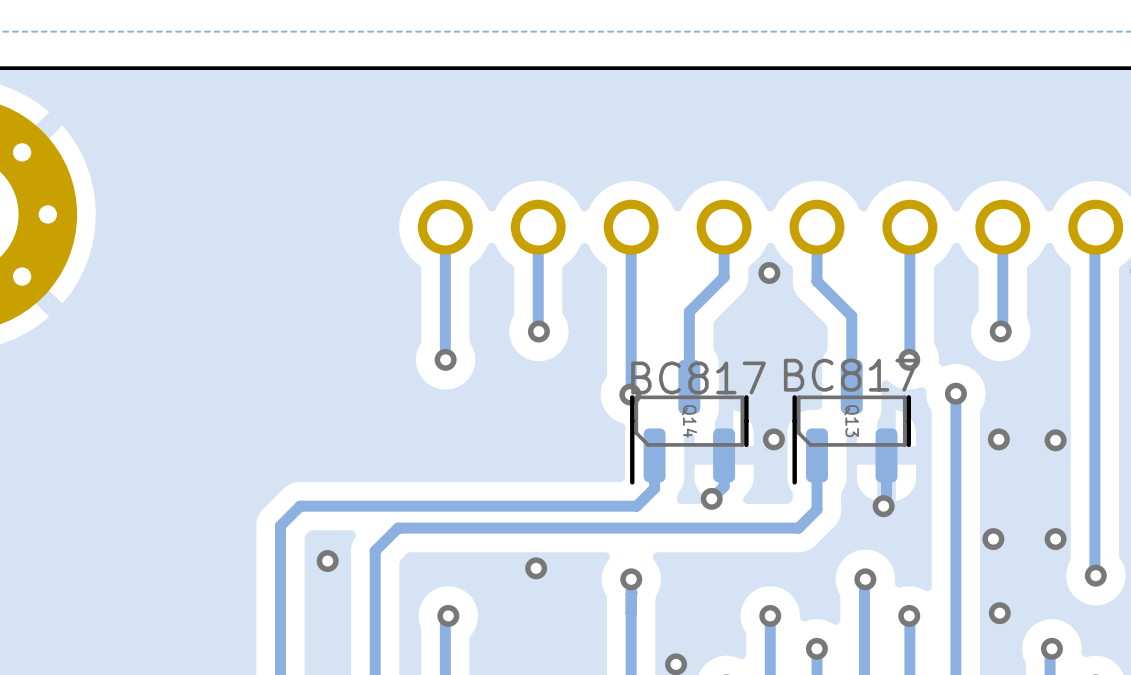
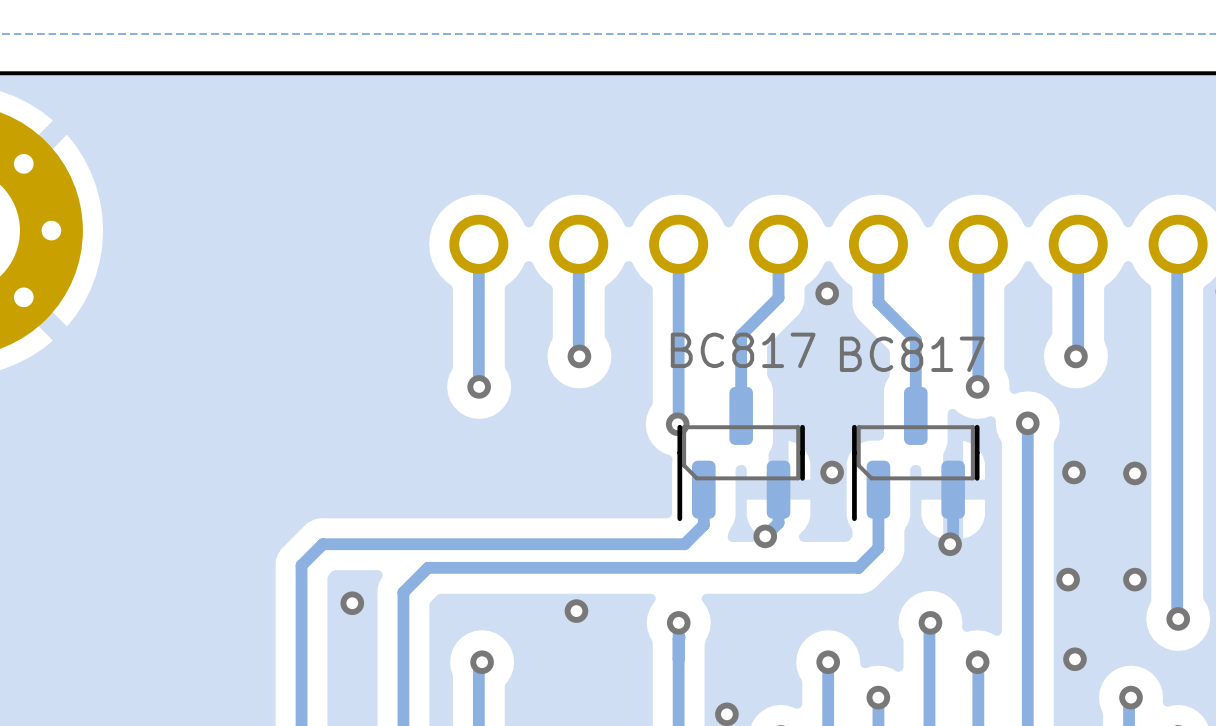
Q13 value position: BC817 (851, 375) -> BC817 (912, 354)
Q14 value position: BC817 (698, 377) -> BC817 (743, 350)
Q14 name: Q14 (689, 421) -> none
Q13 name: Q13 (851, 421) -> none

